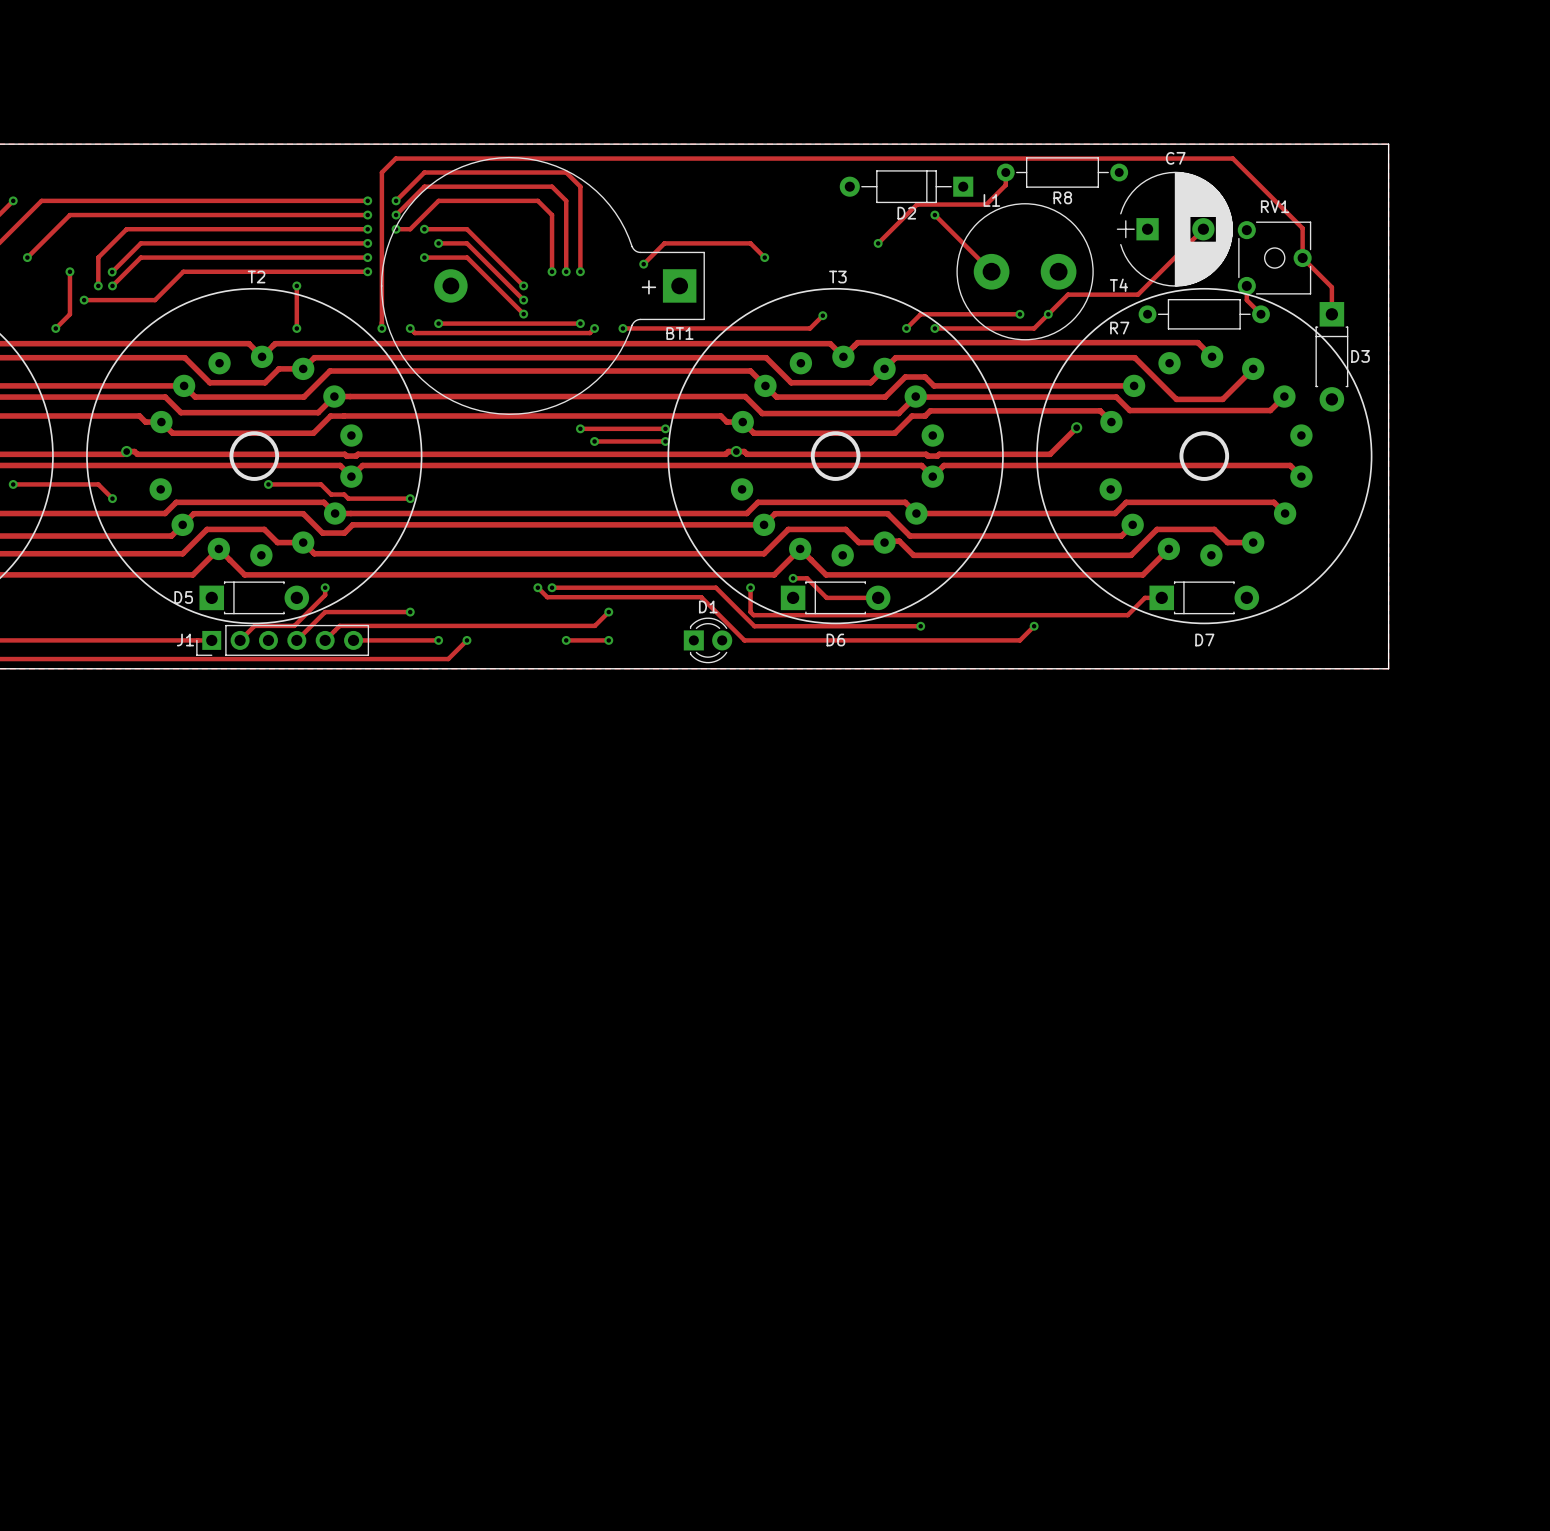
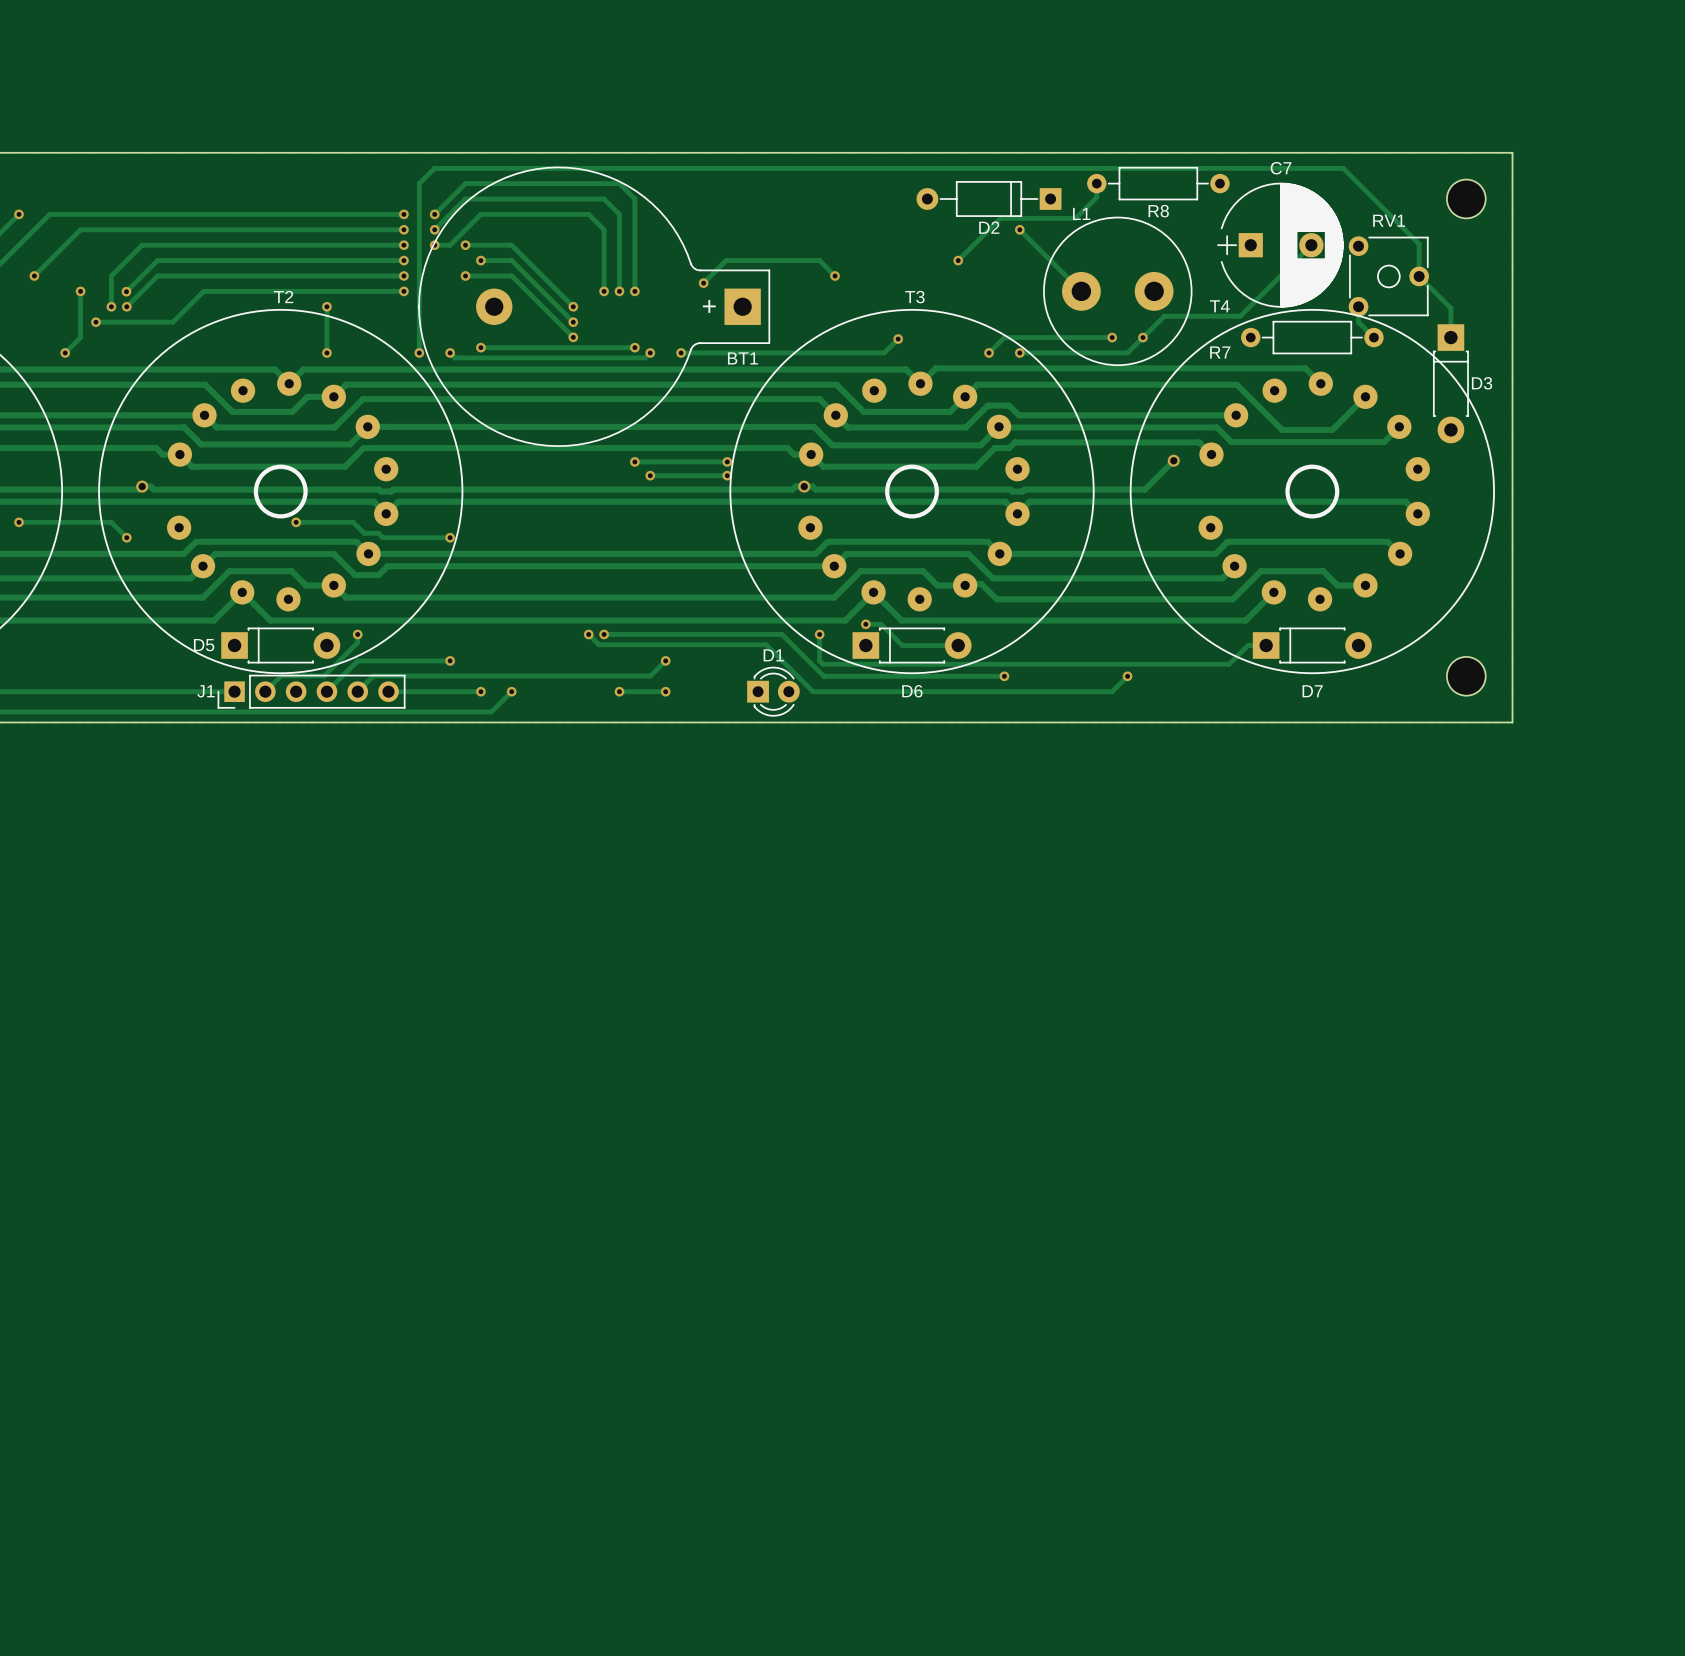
part: none -> (1466, 198)
part: none -> (1466, 676)

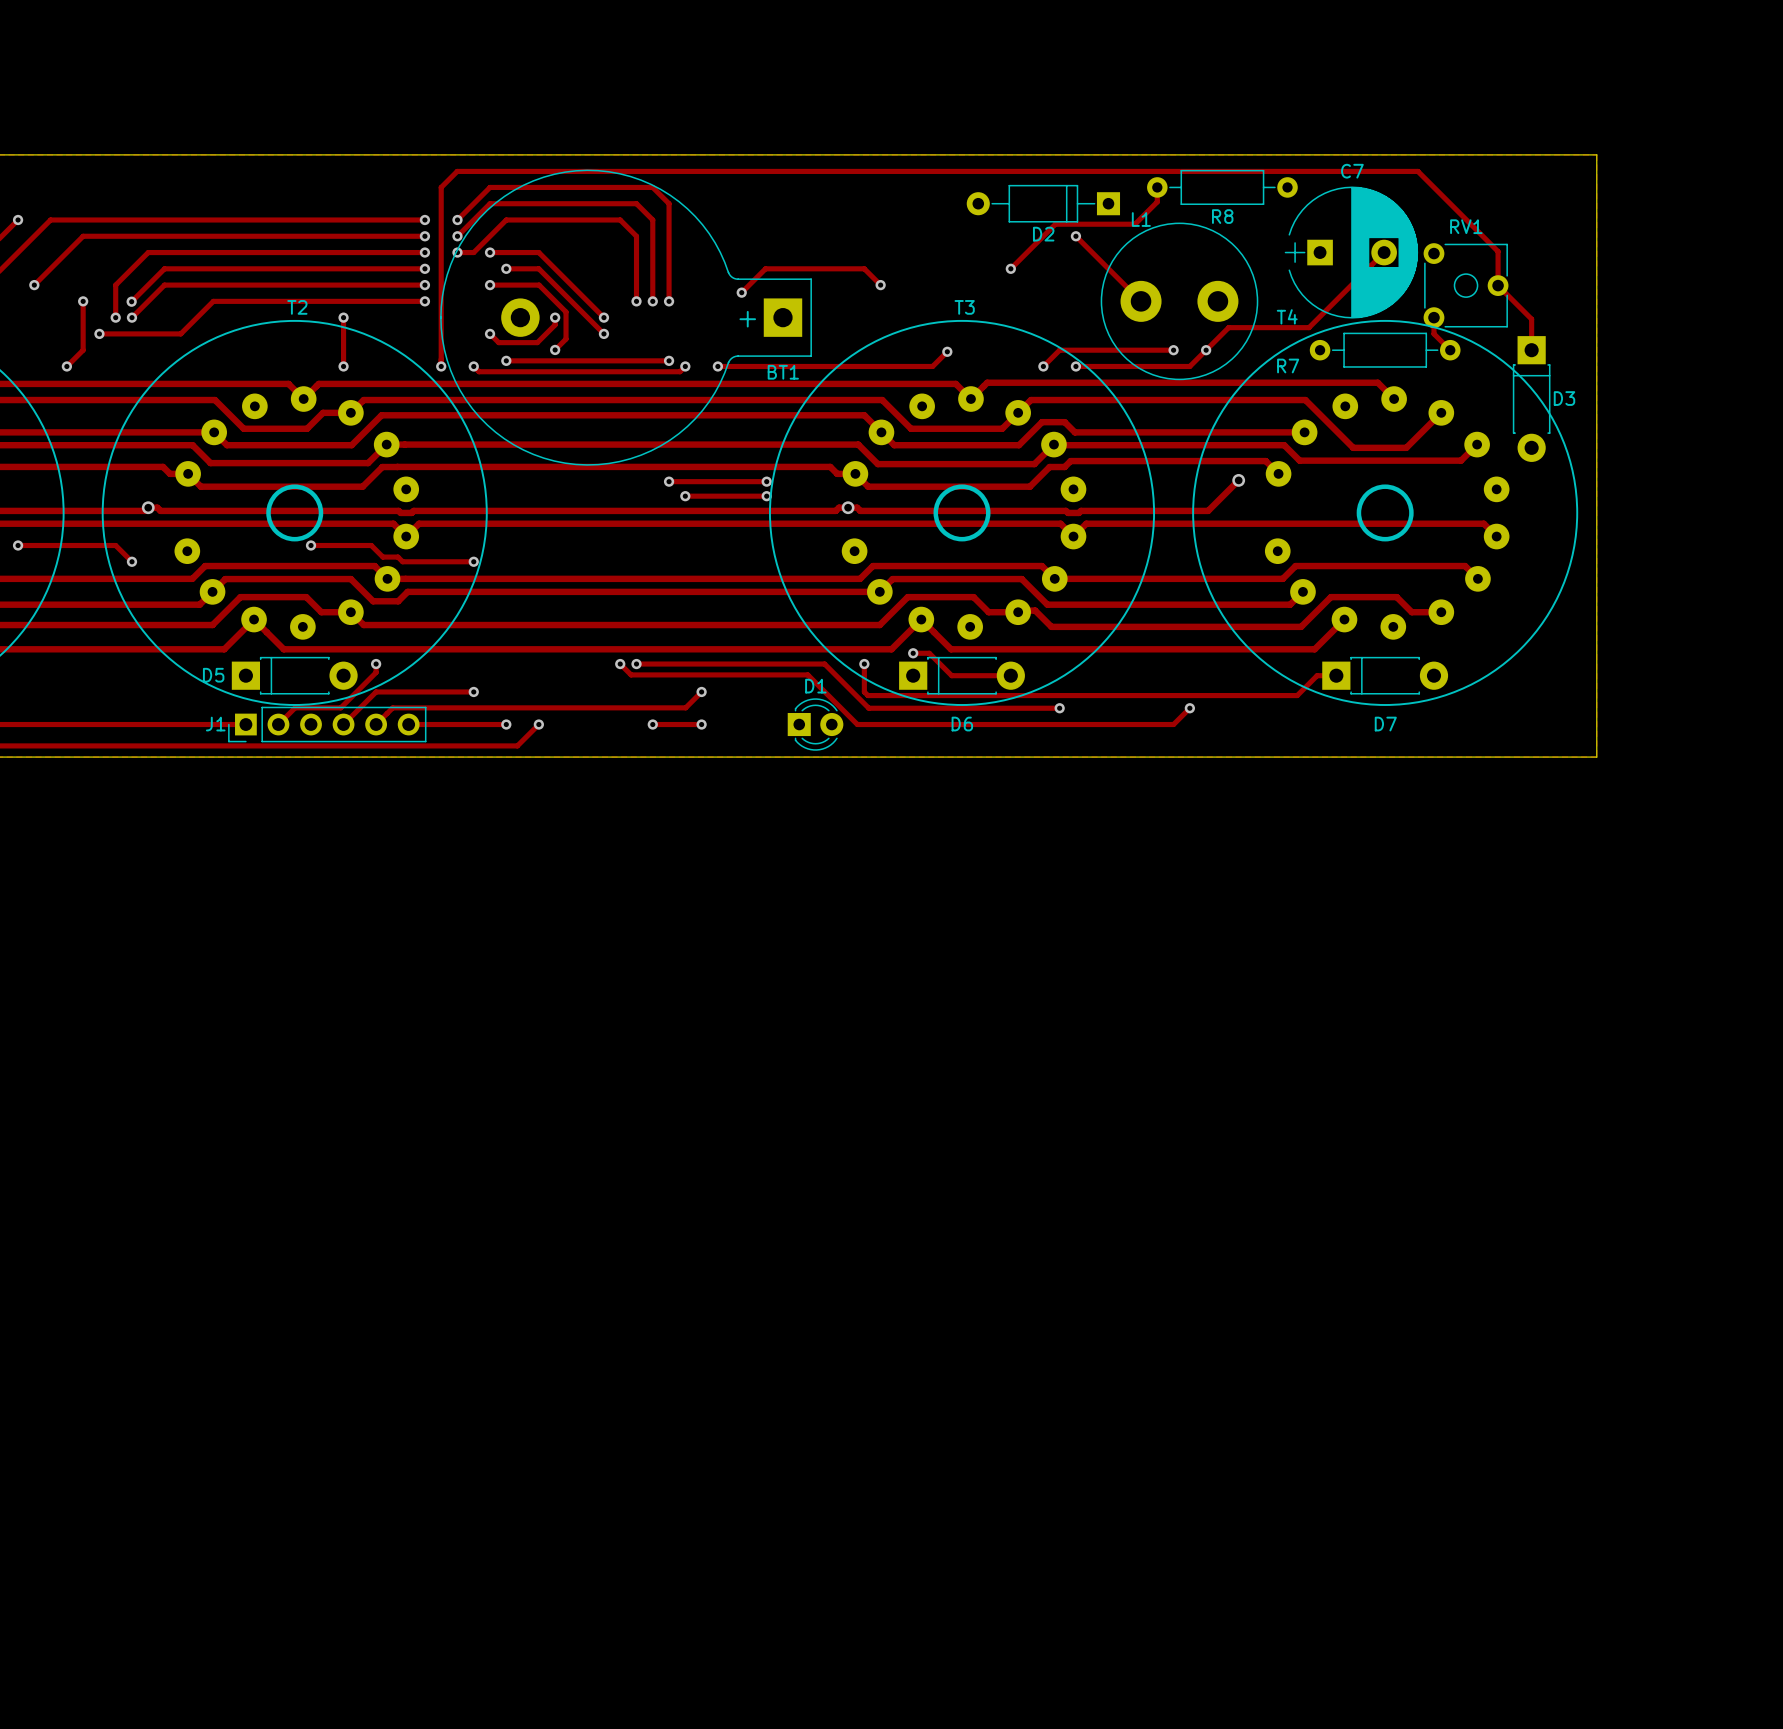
part: (1466, 198) -> none
track: (537, 301) (573, 337) -> (566, 312) (566, 339) (555, 349)
track: none -> (555, 317) (555, 324) (537, 342) (498, 342) (490, 333)
via: none -> (555, 317)
via: none -> (490, 333)
via: none -> (555, 349)
via: (573, 337) -> none
part: (1466, 676) -> none

